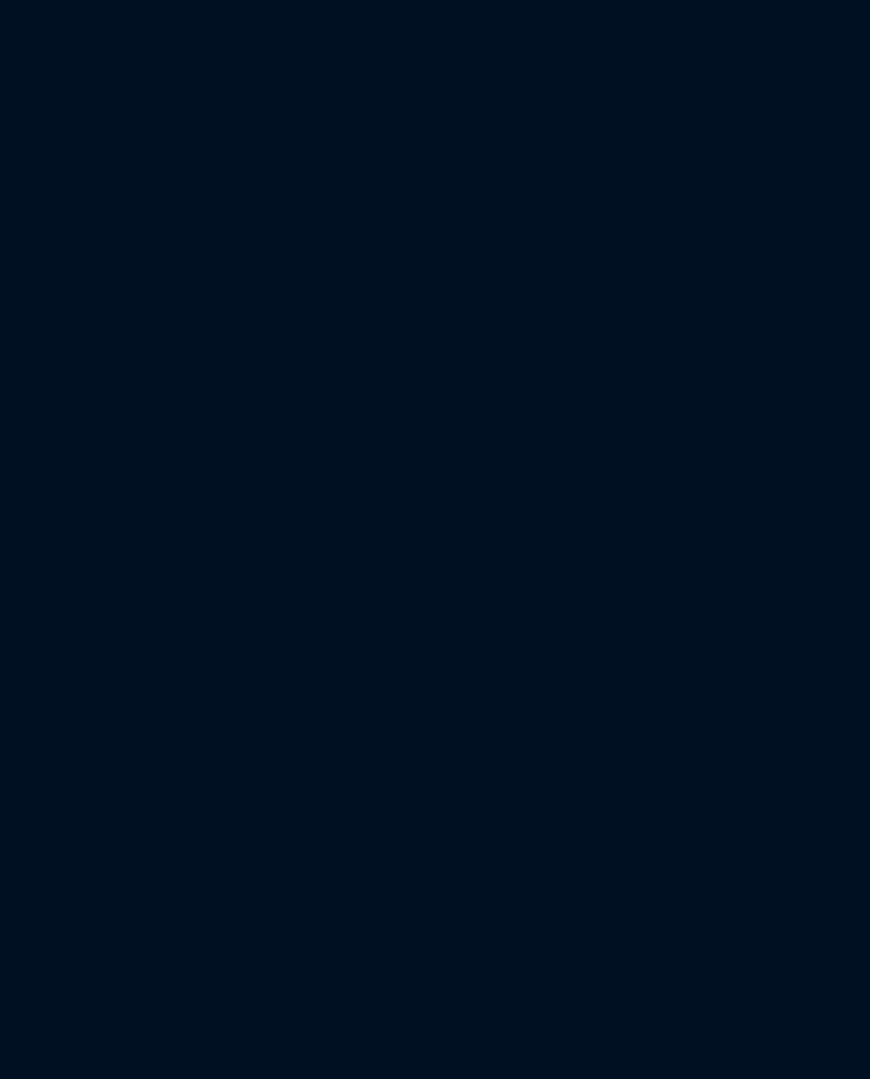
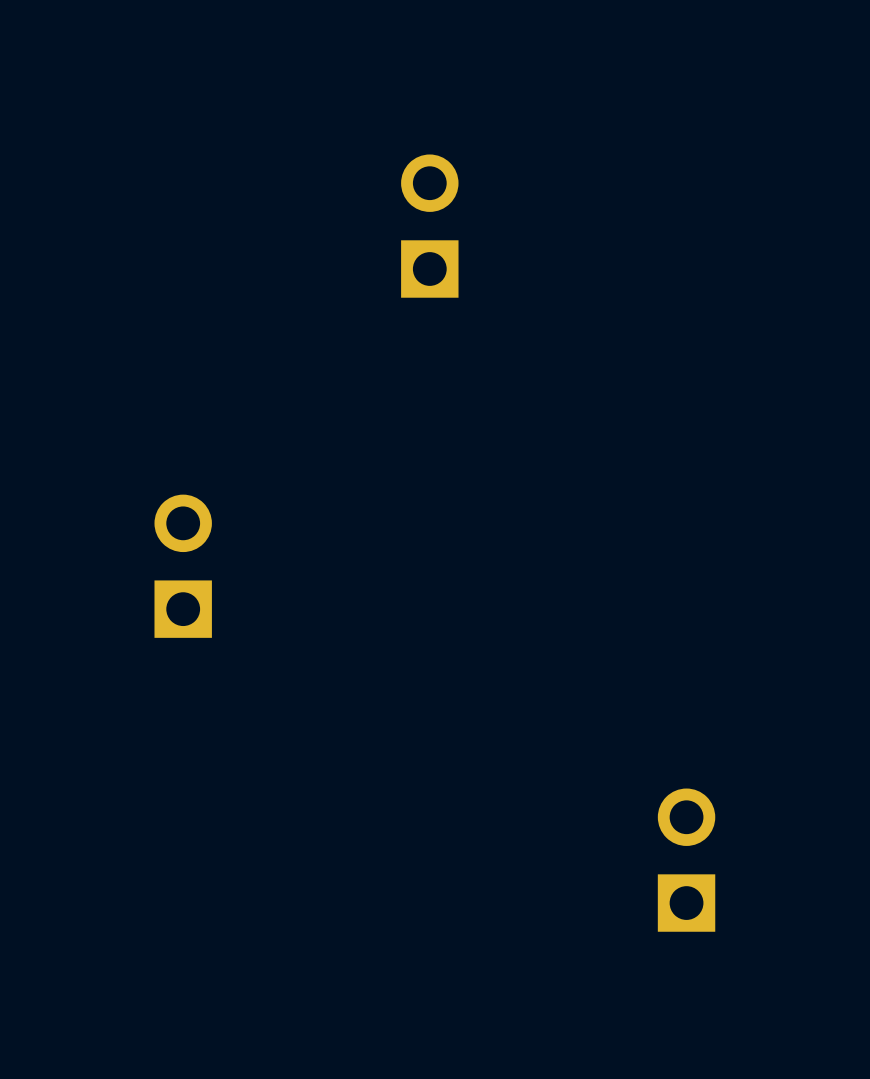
part: none -> (429, 226)
part: none -> (183, 566)
part: none -> (686, 860)

